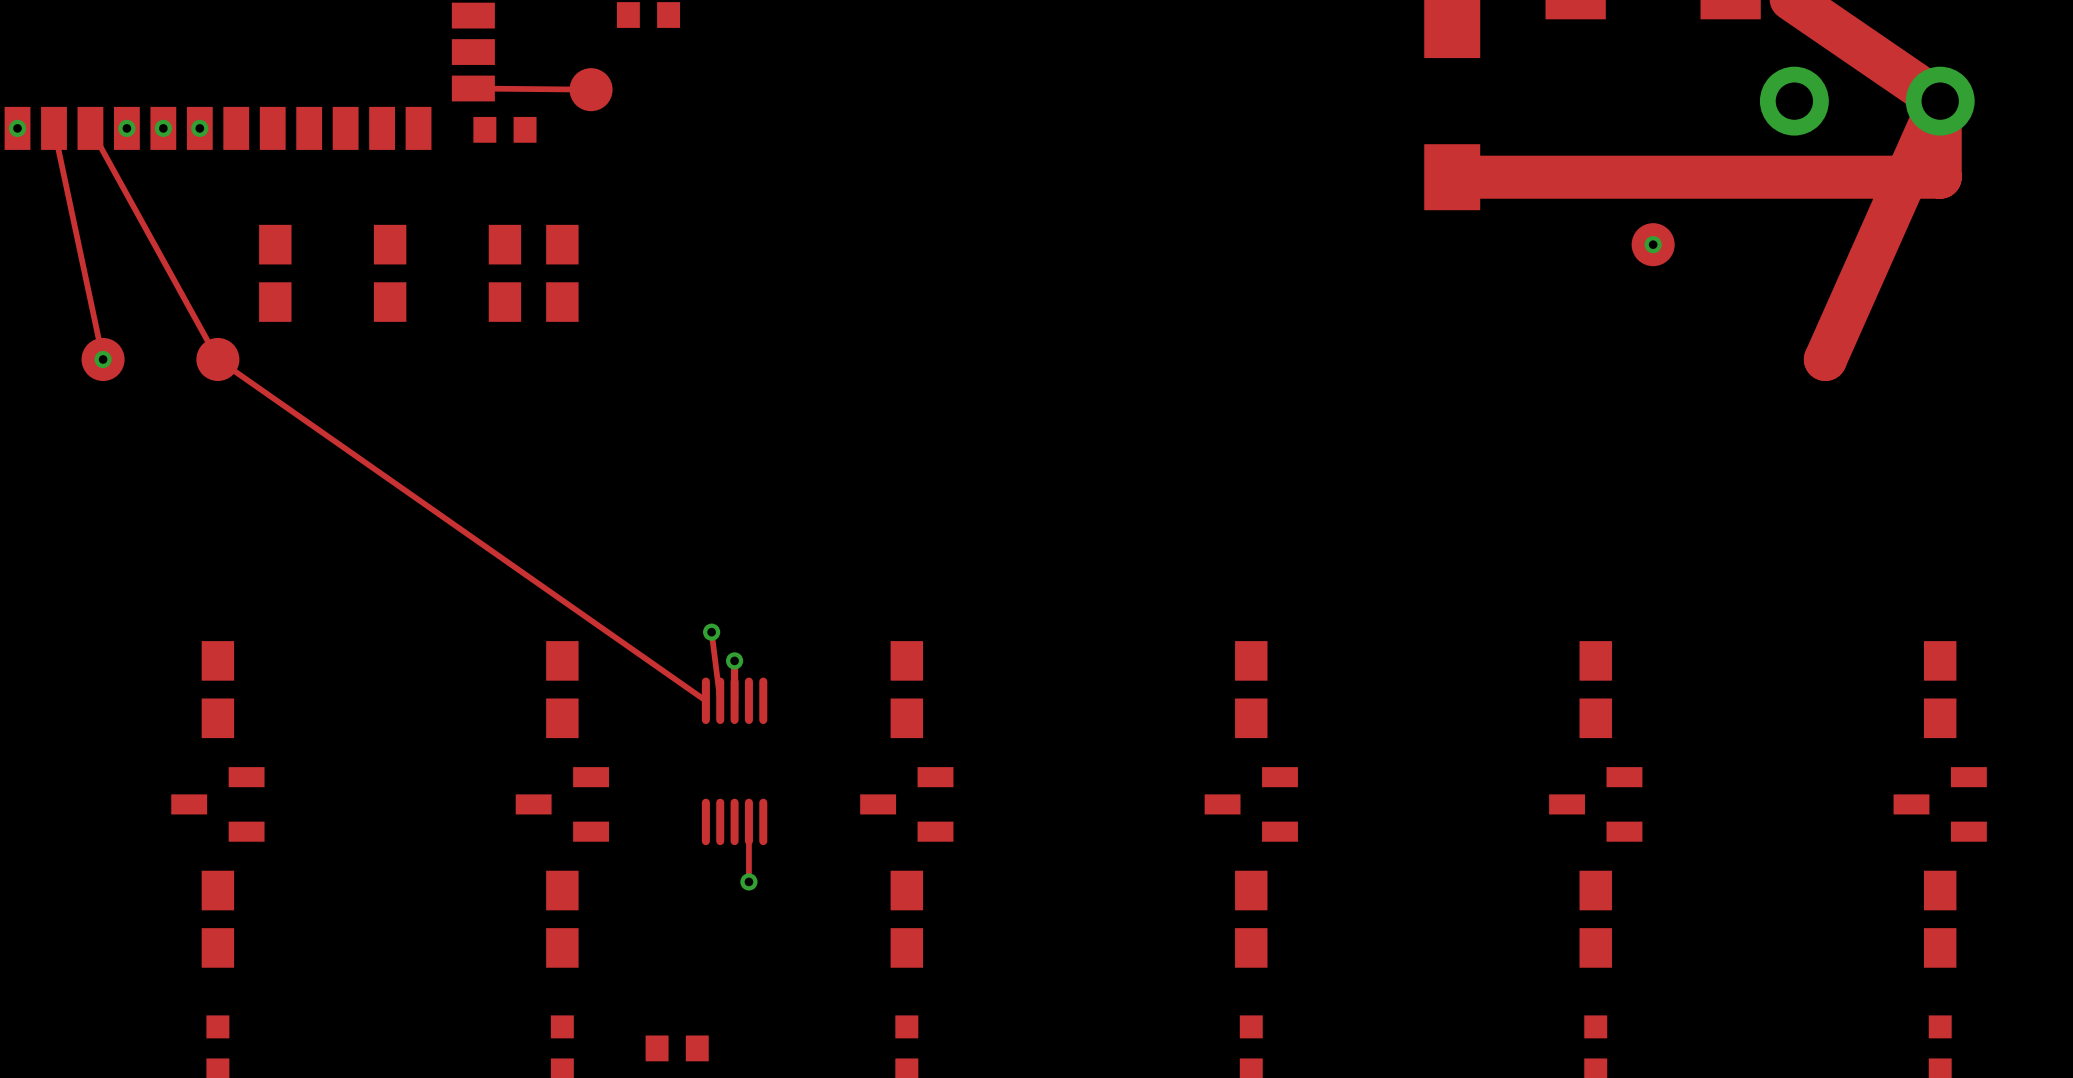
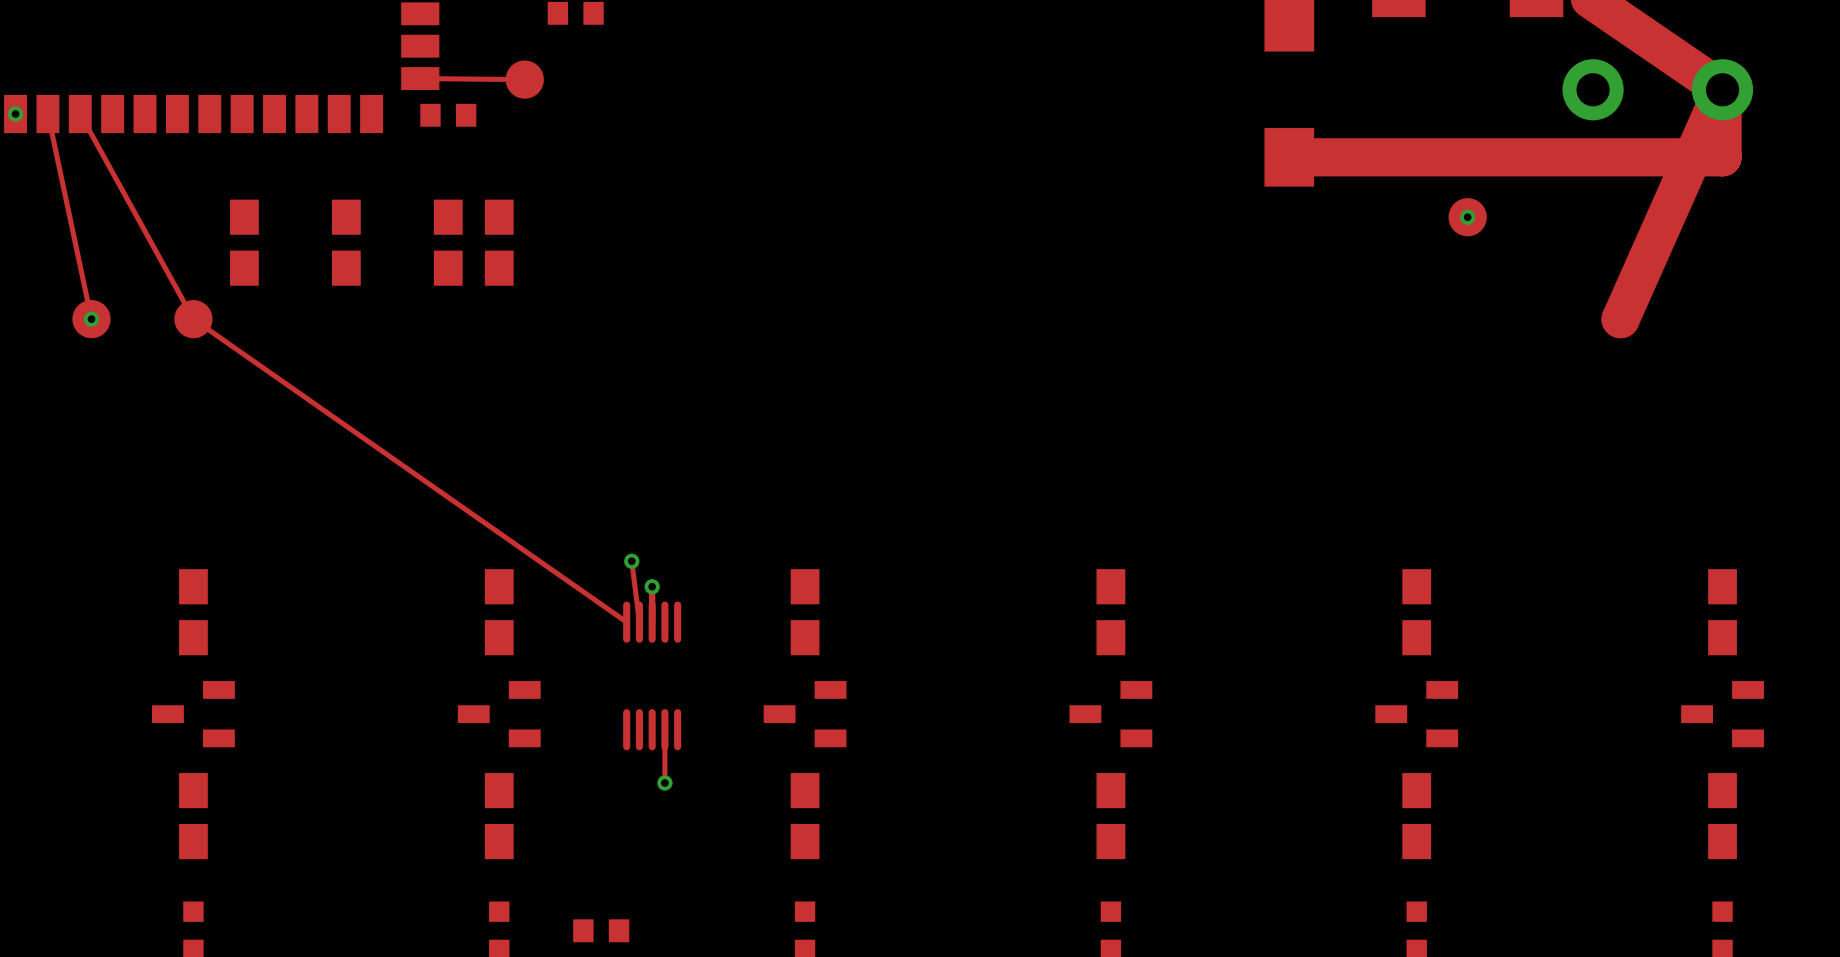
via: (126, 128) -> none
via: (163, 128) -> none
via: (199, 128) -> none

